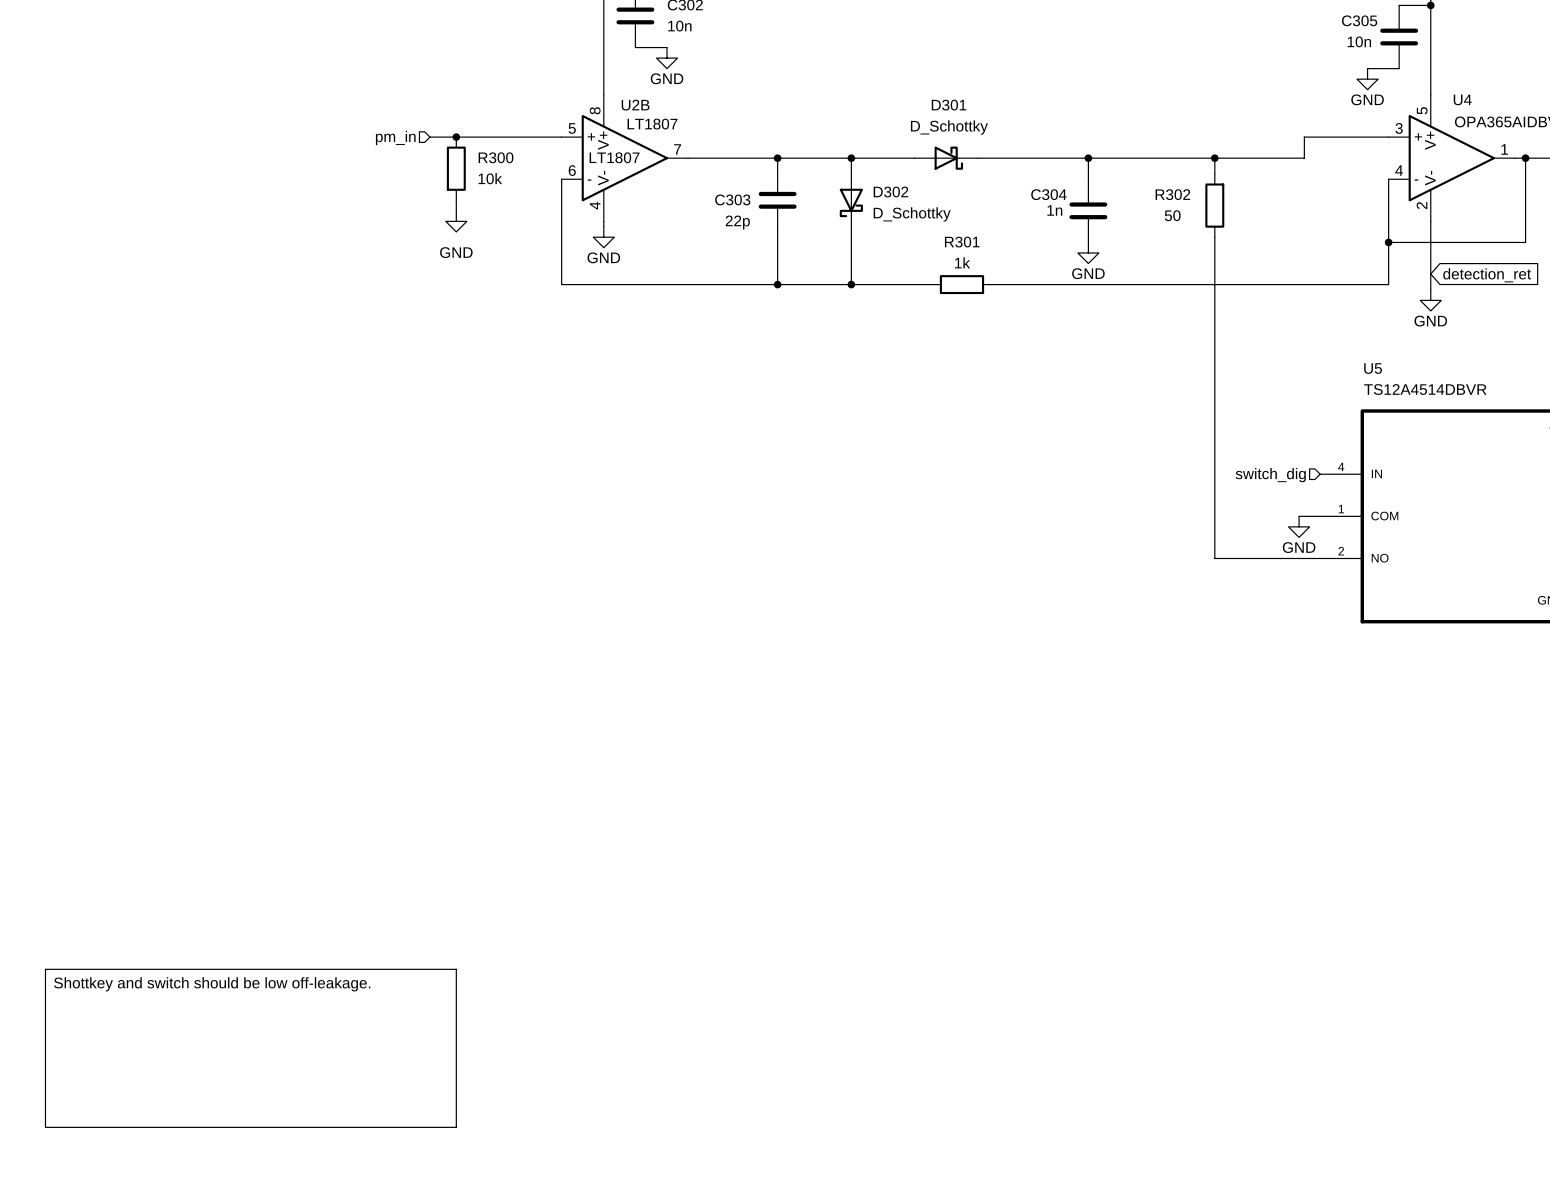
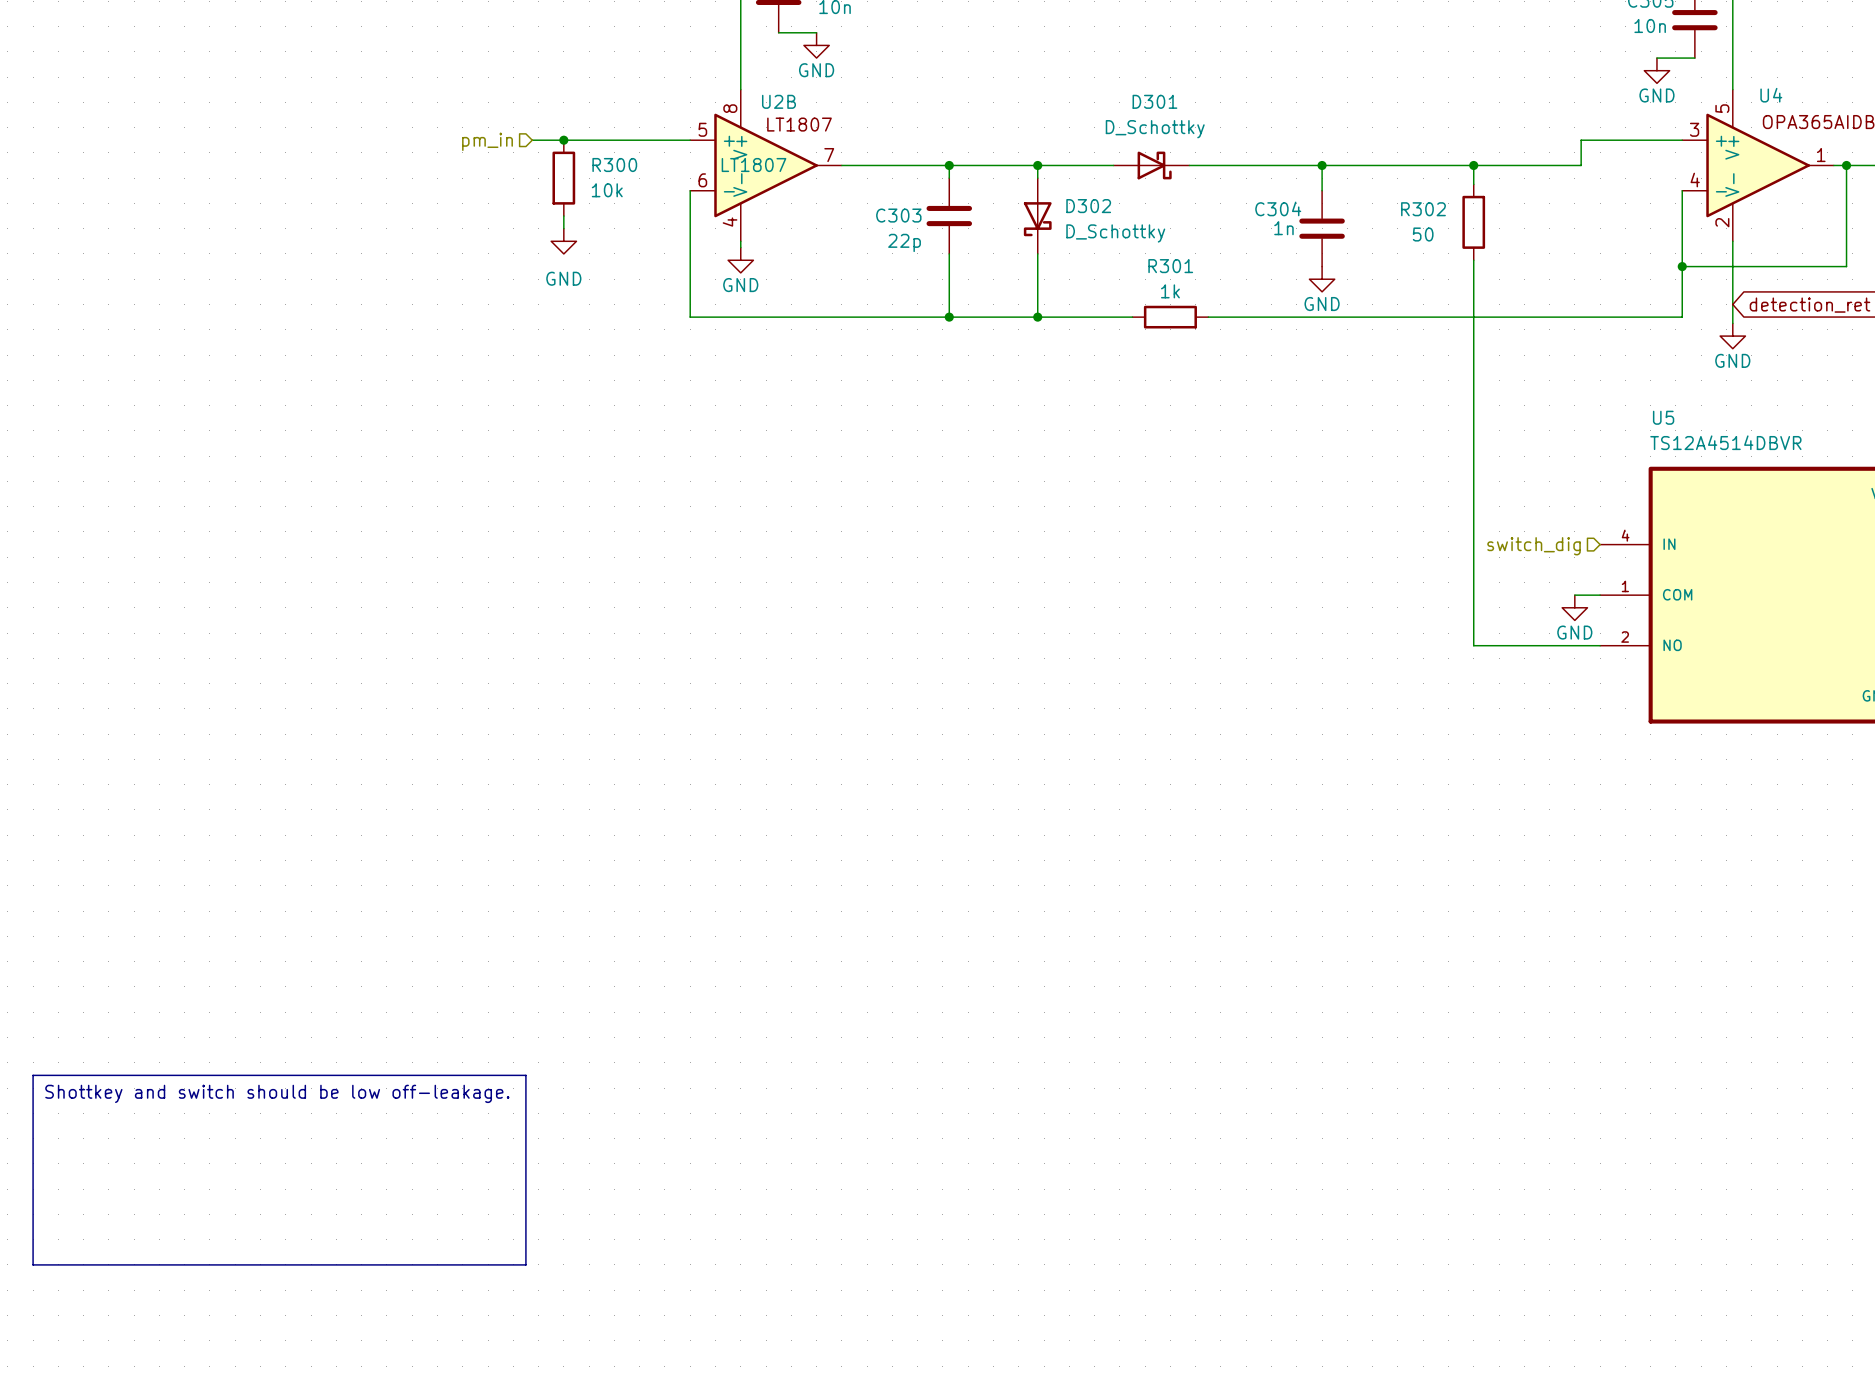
line: (45, 969) (456, 969) (456, 1127) (45, 1127) (45, 969) -> (33, 1075) (525, 1075) (525, 1264) (33, 1264) (33, 1075)
text position: Shottkey and switch should be low off-leakage. (212, 984) -> Shottkey and switch should be low off-leakage. (277, 1093)

